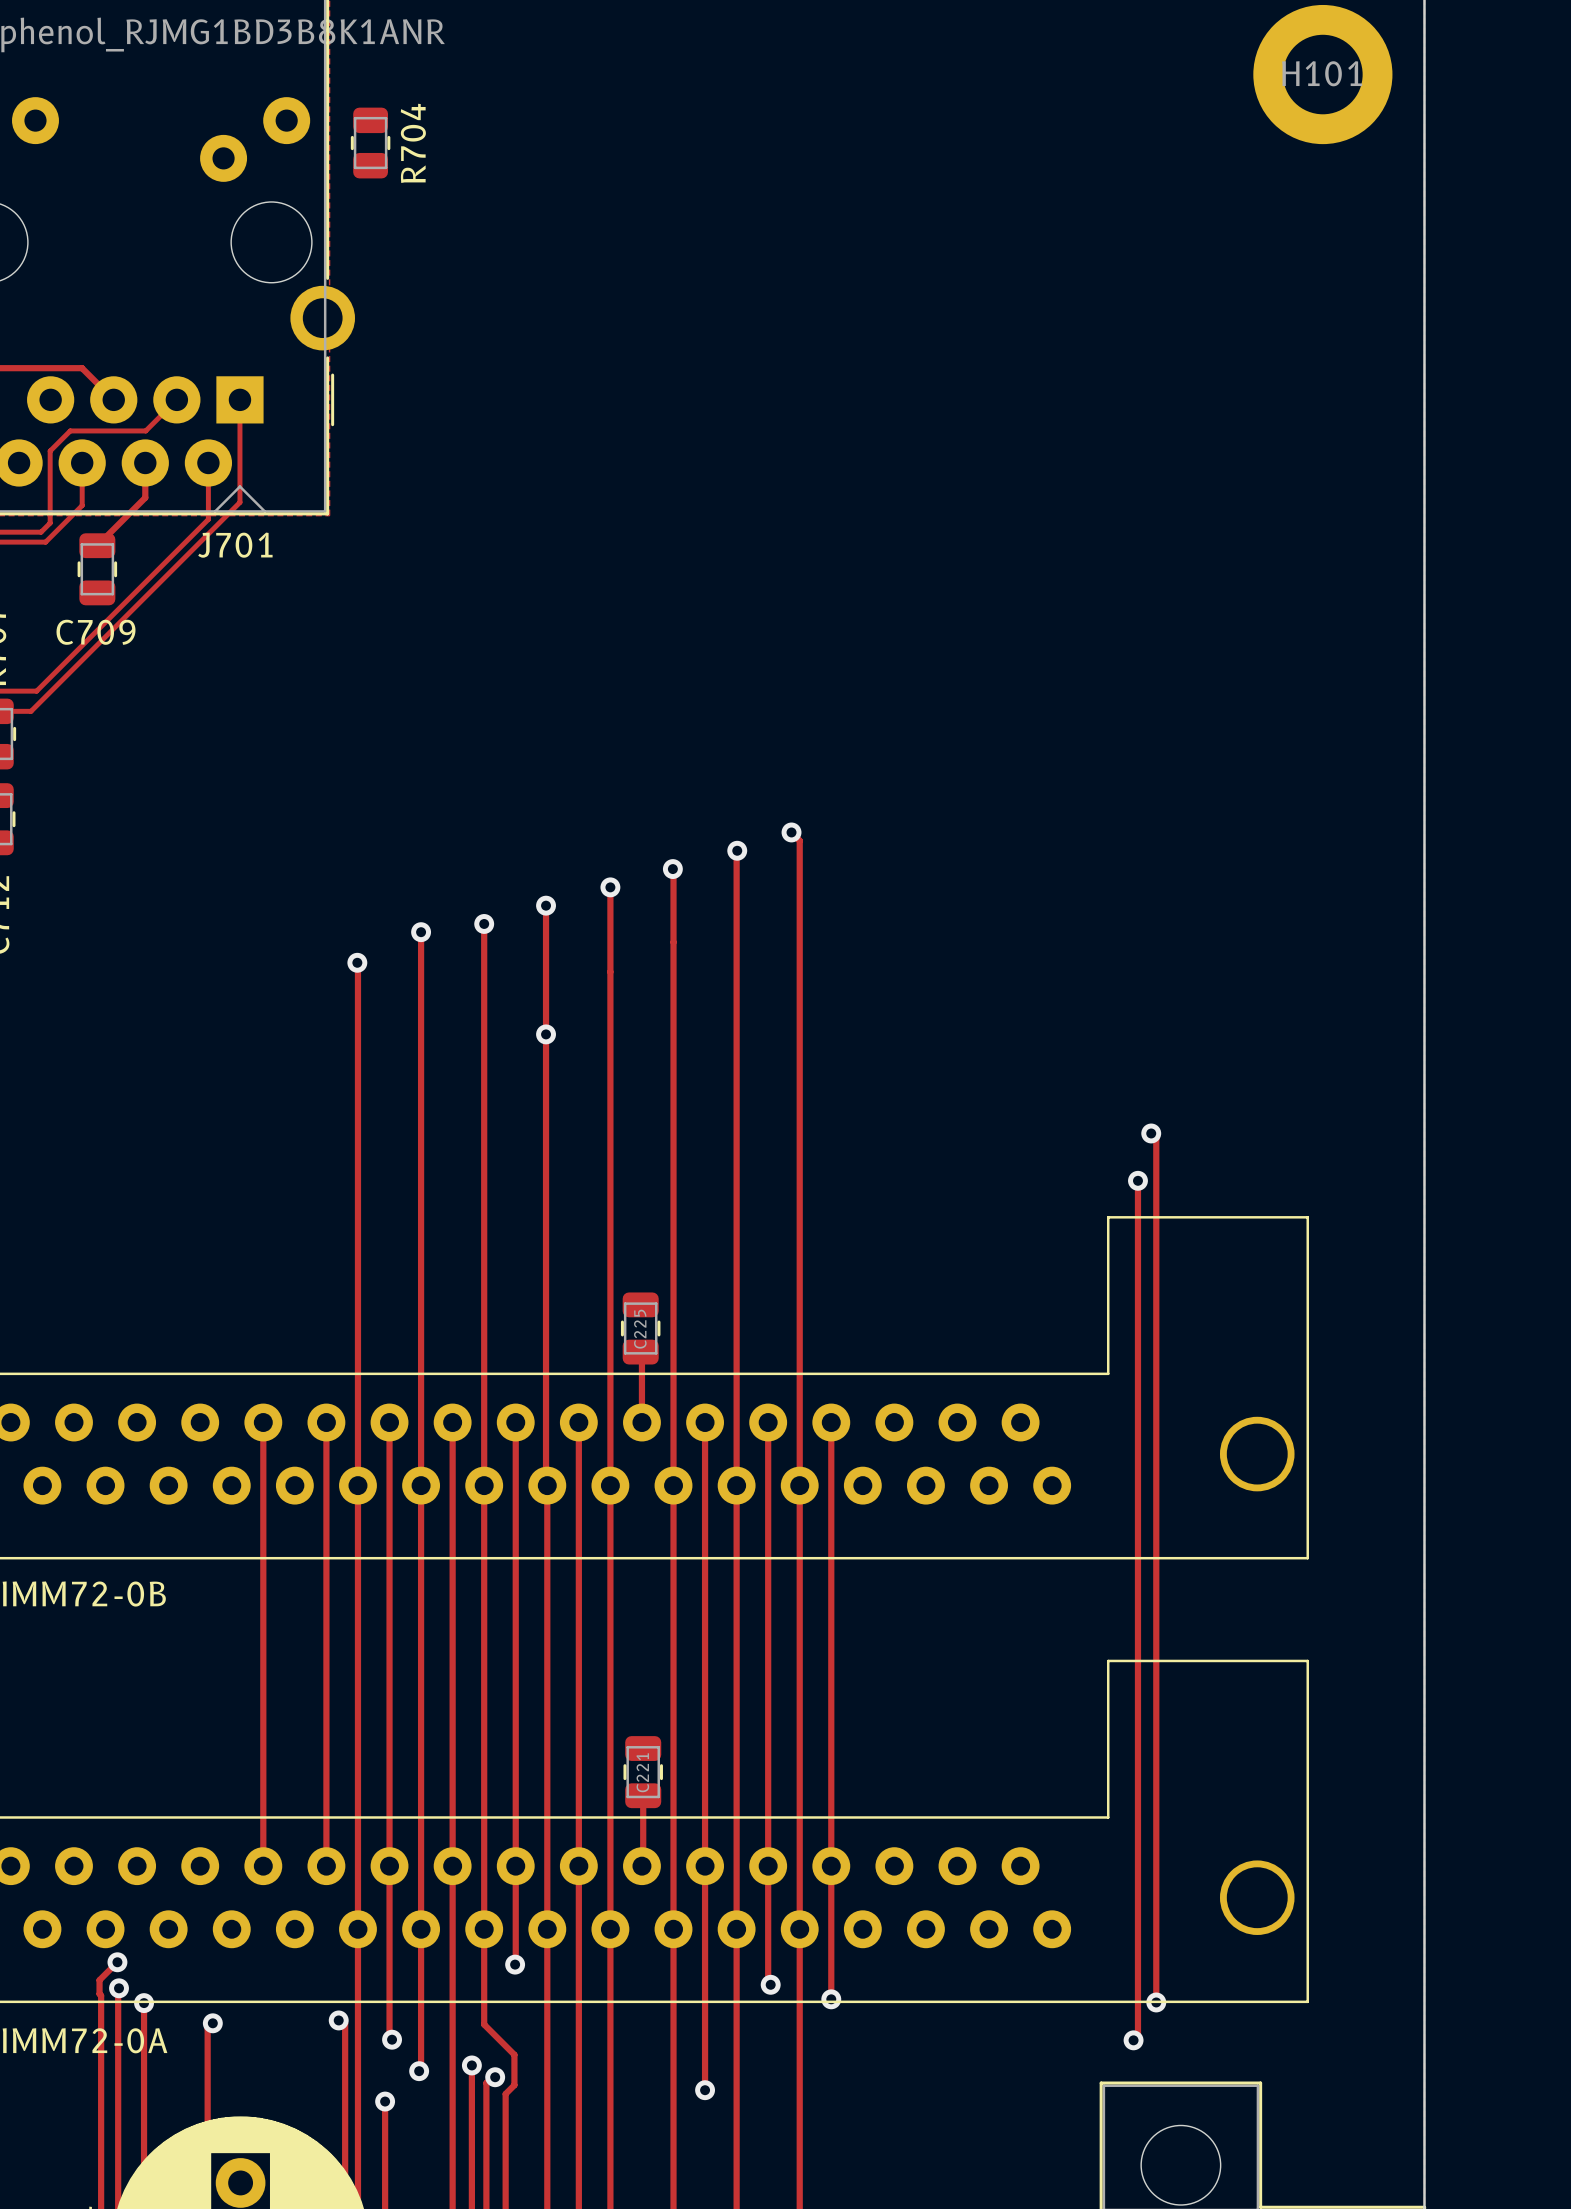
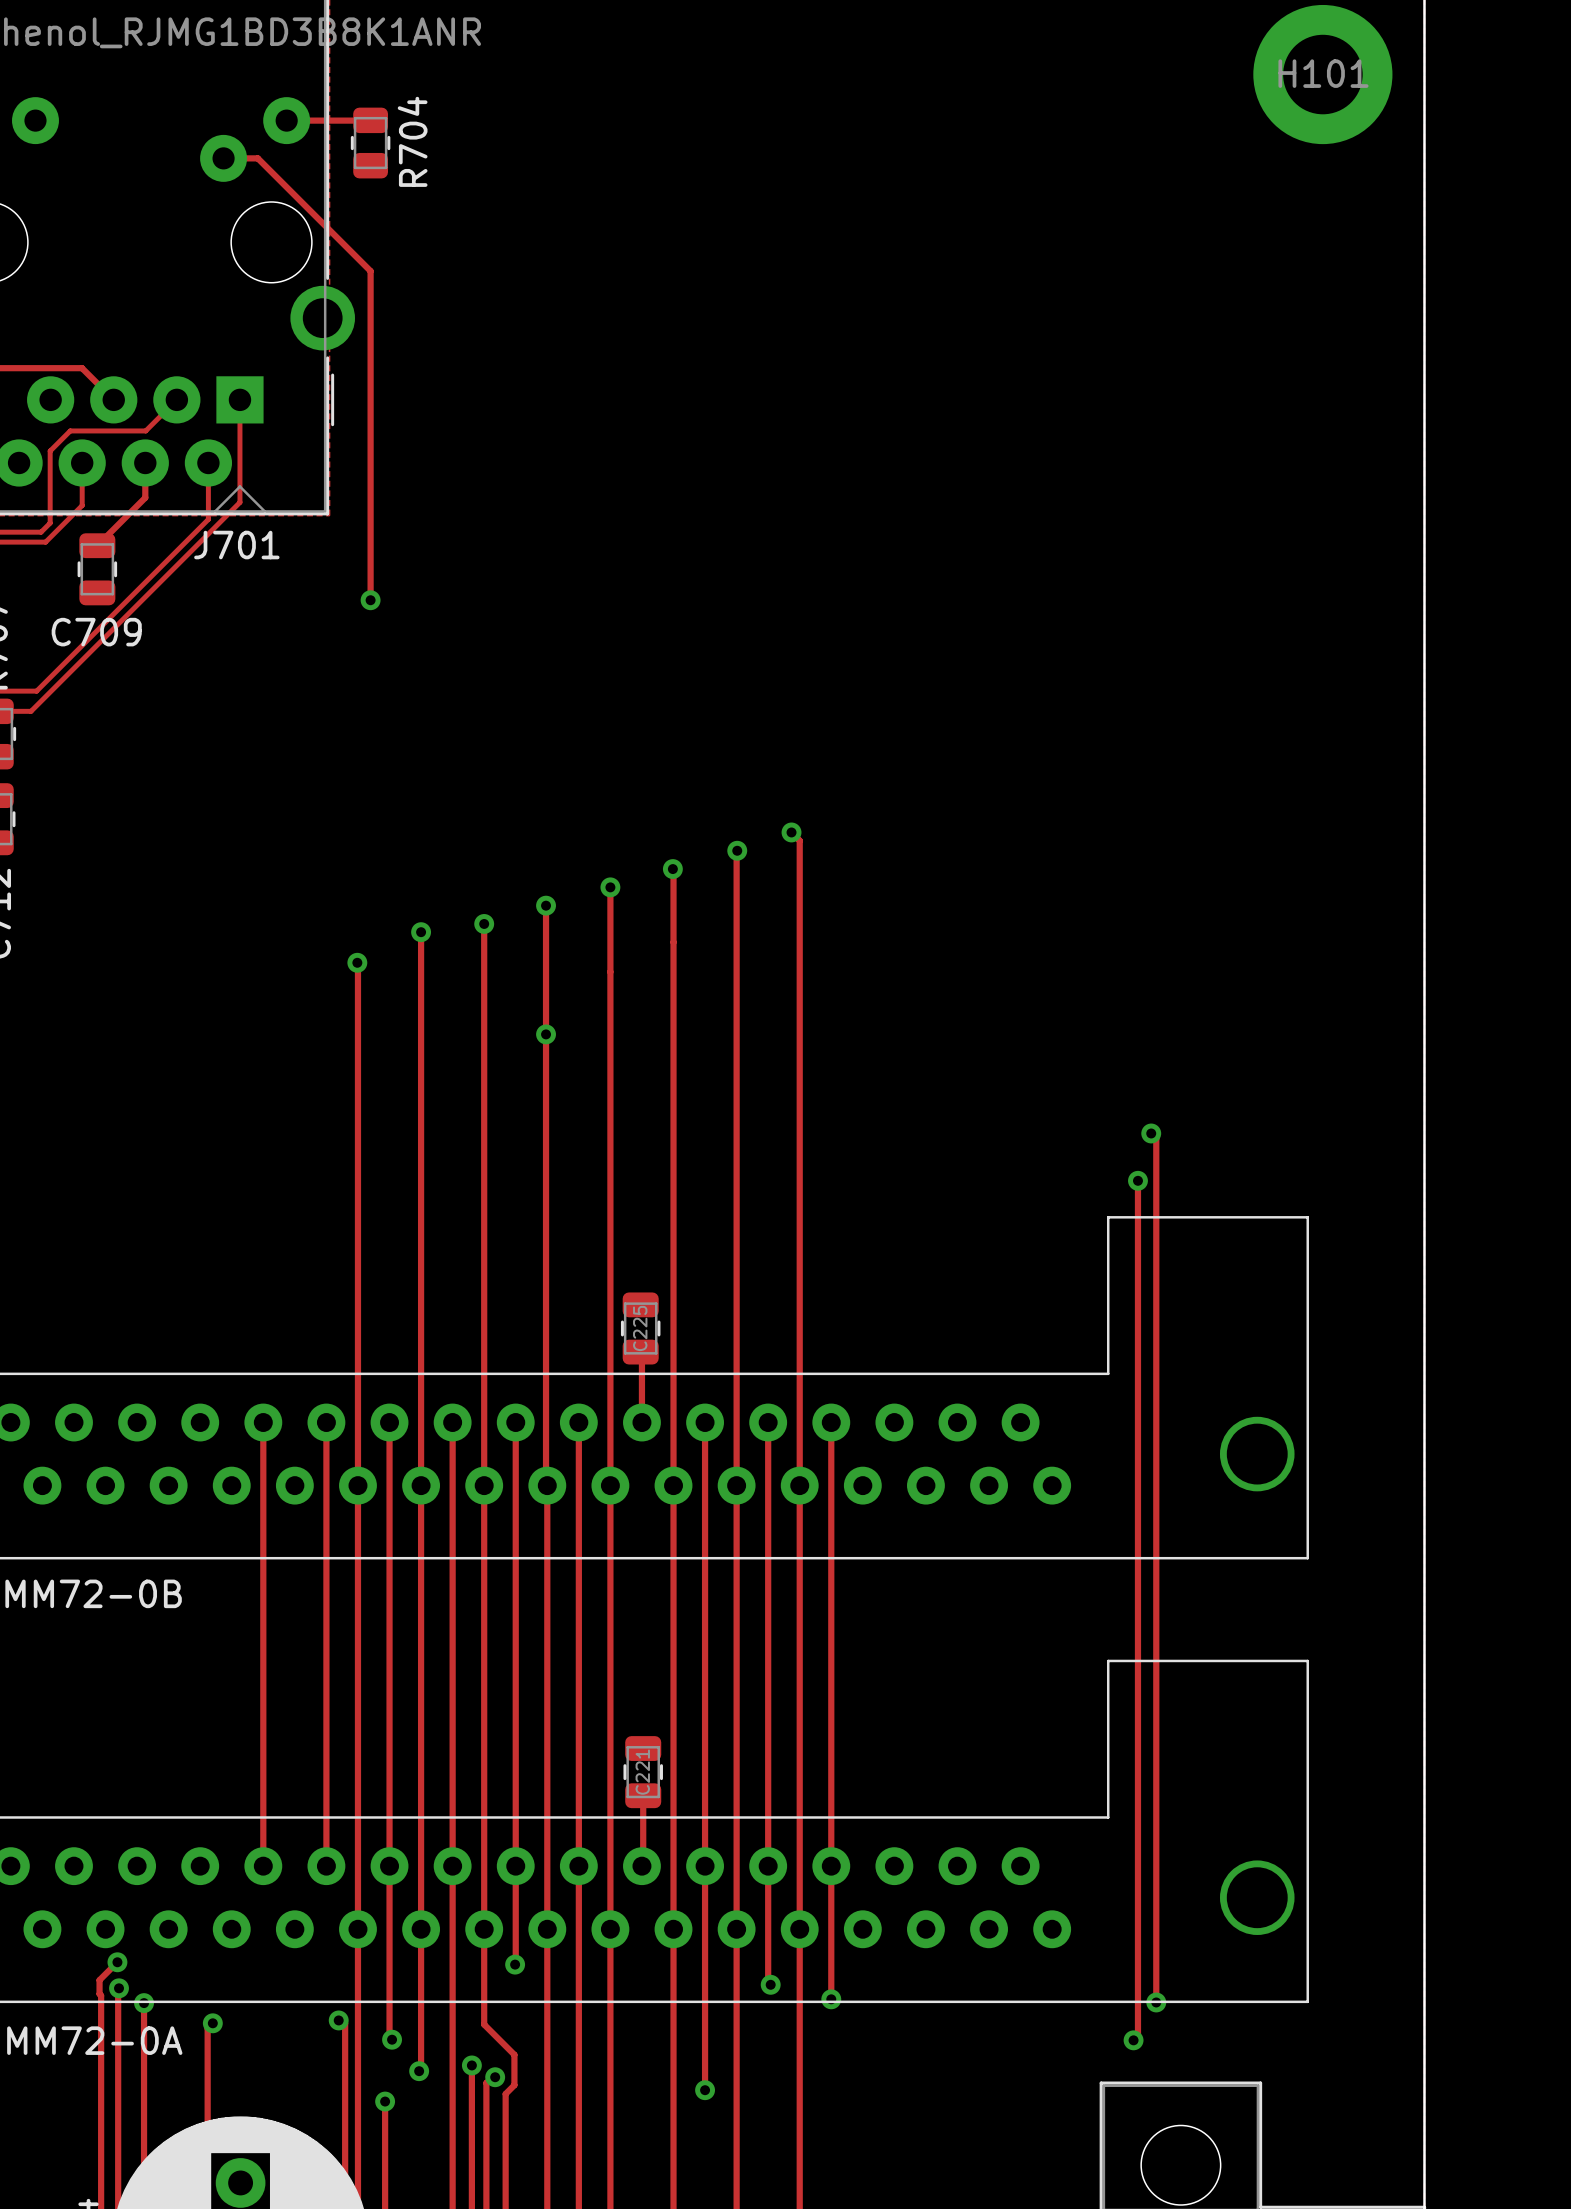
track: none -> (286, 120) (370, 120)
track: none -> (223, 158) (257, 158) (370, 271) (370, 600)
via: none -> (370, 600)

